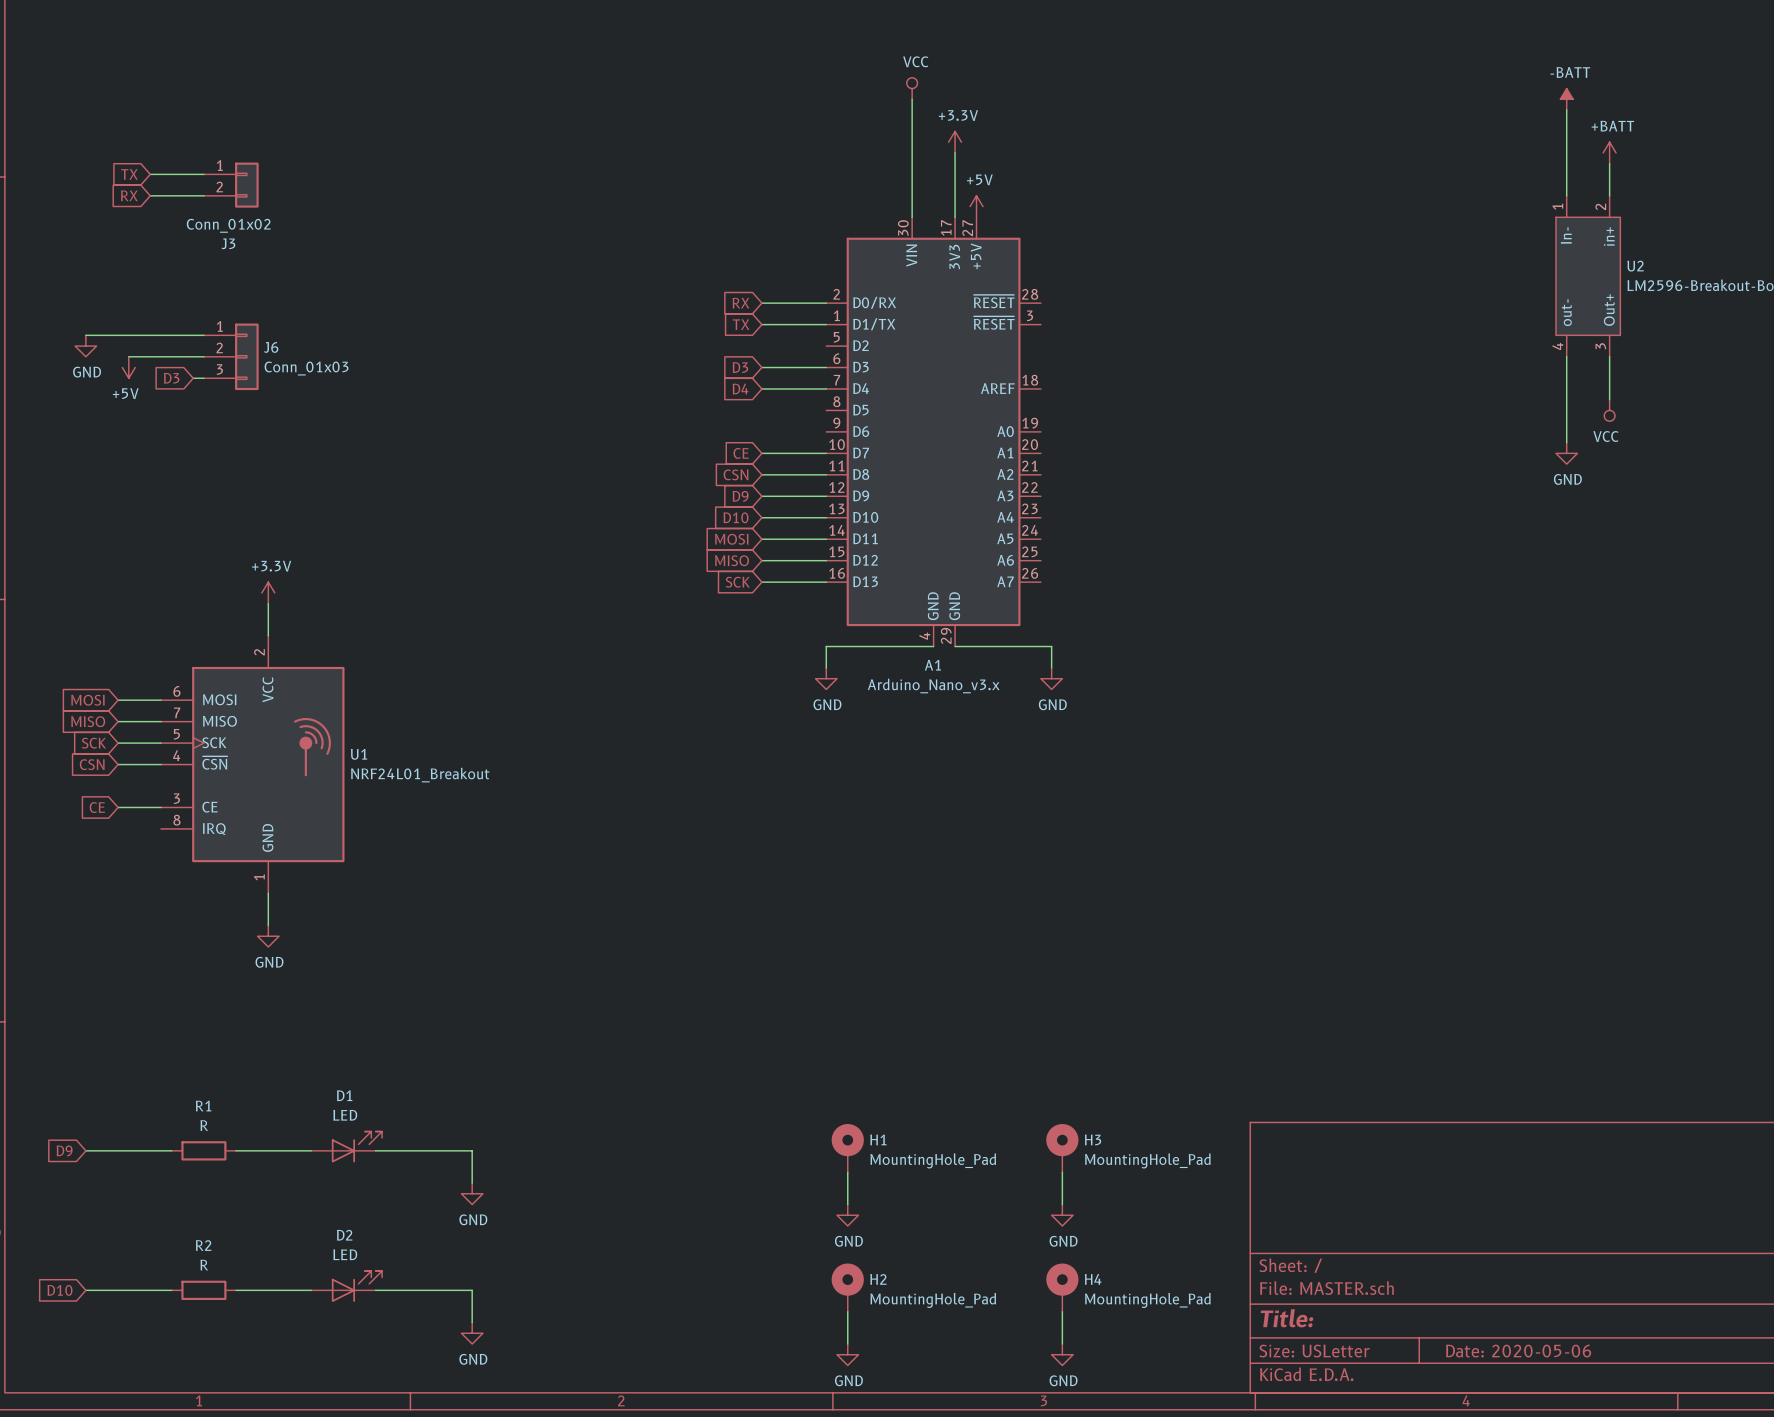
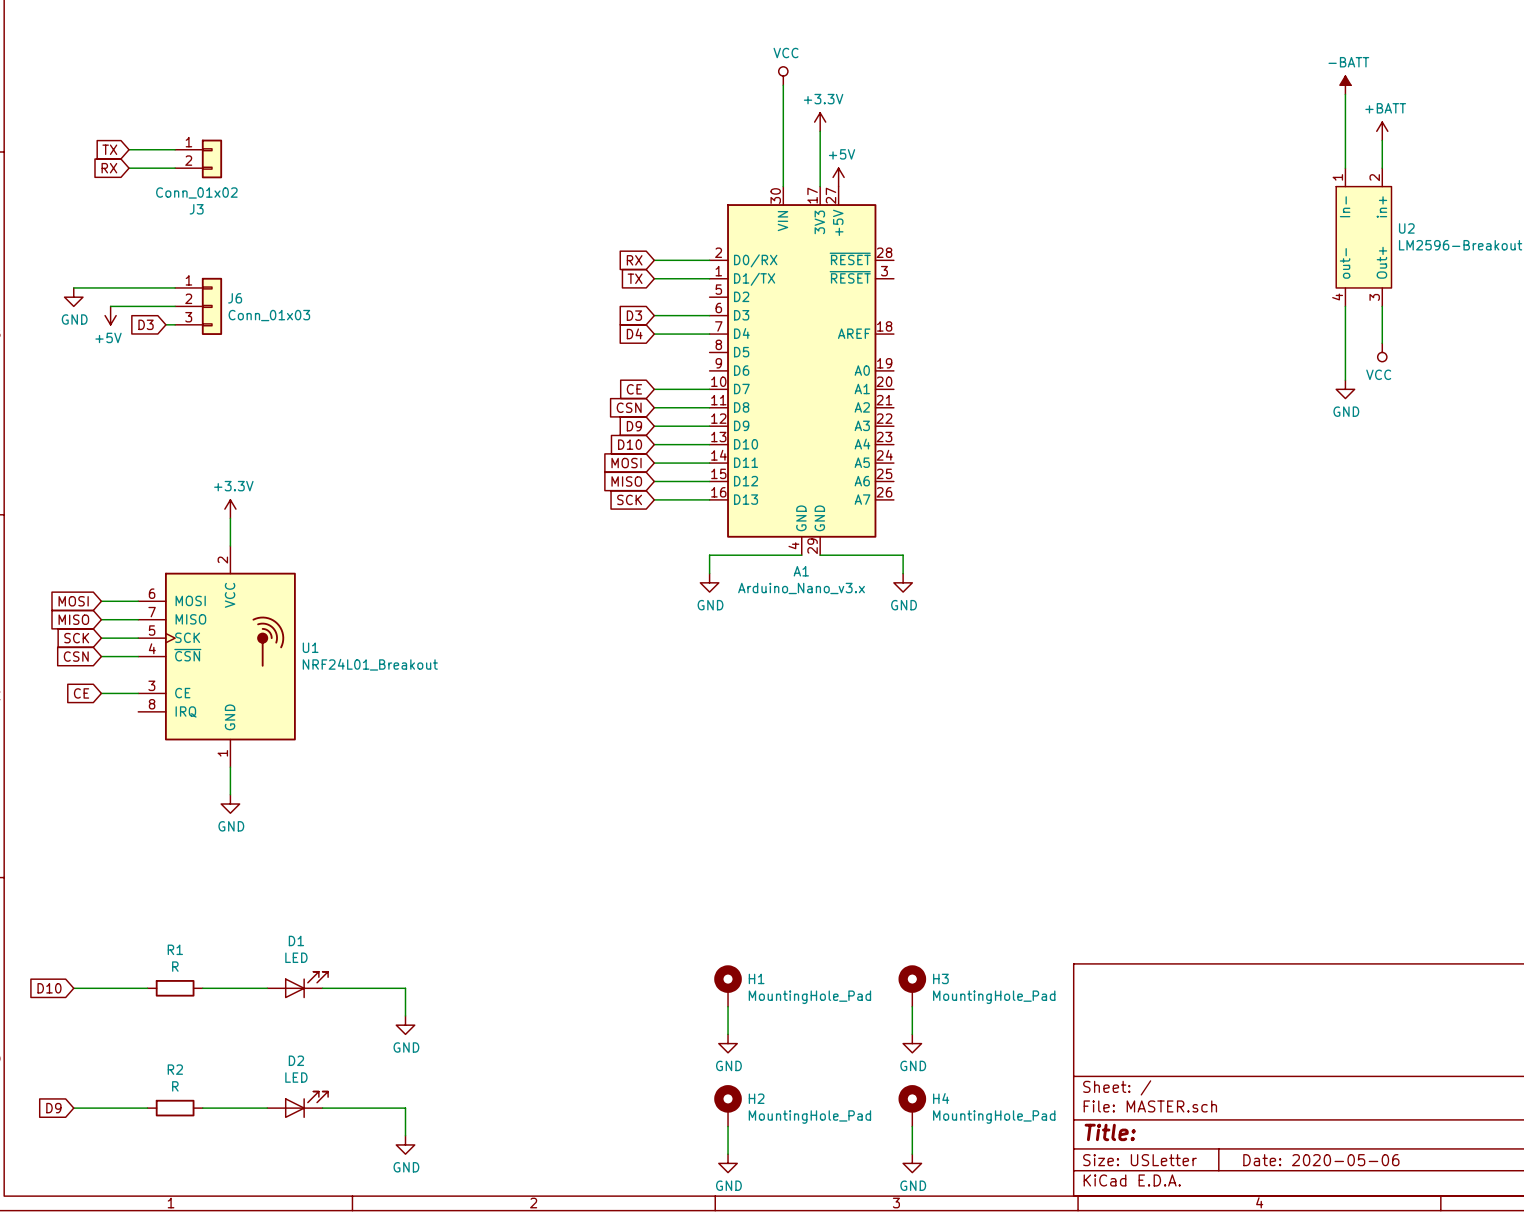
global label: D9 (64, 1150) -> D10 (49, 988)
global label: D10 (59, 1290) -> D9 (53, 1108)

